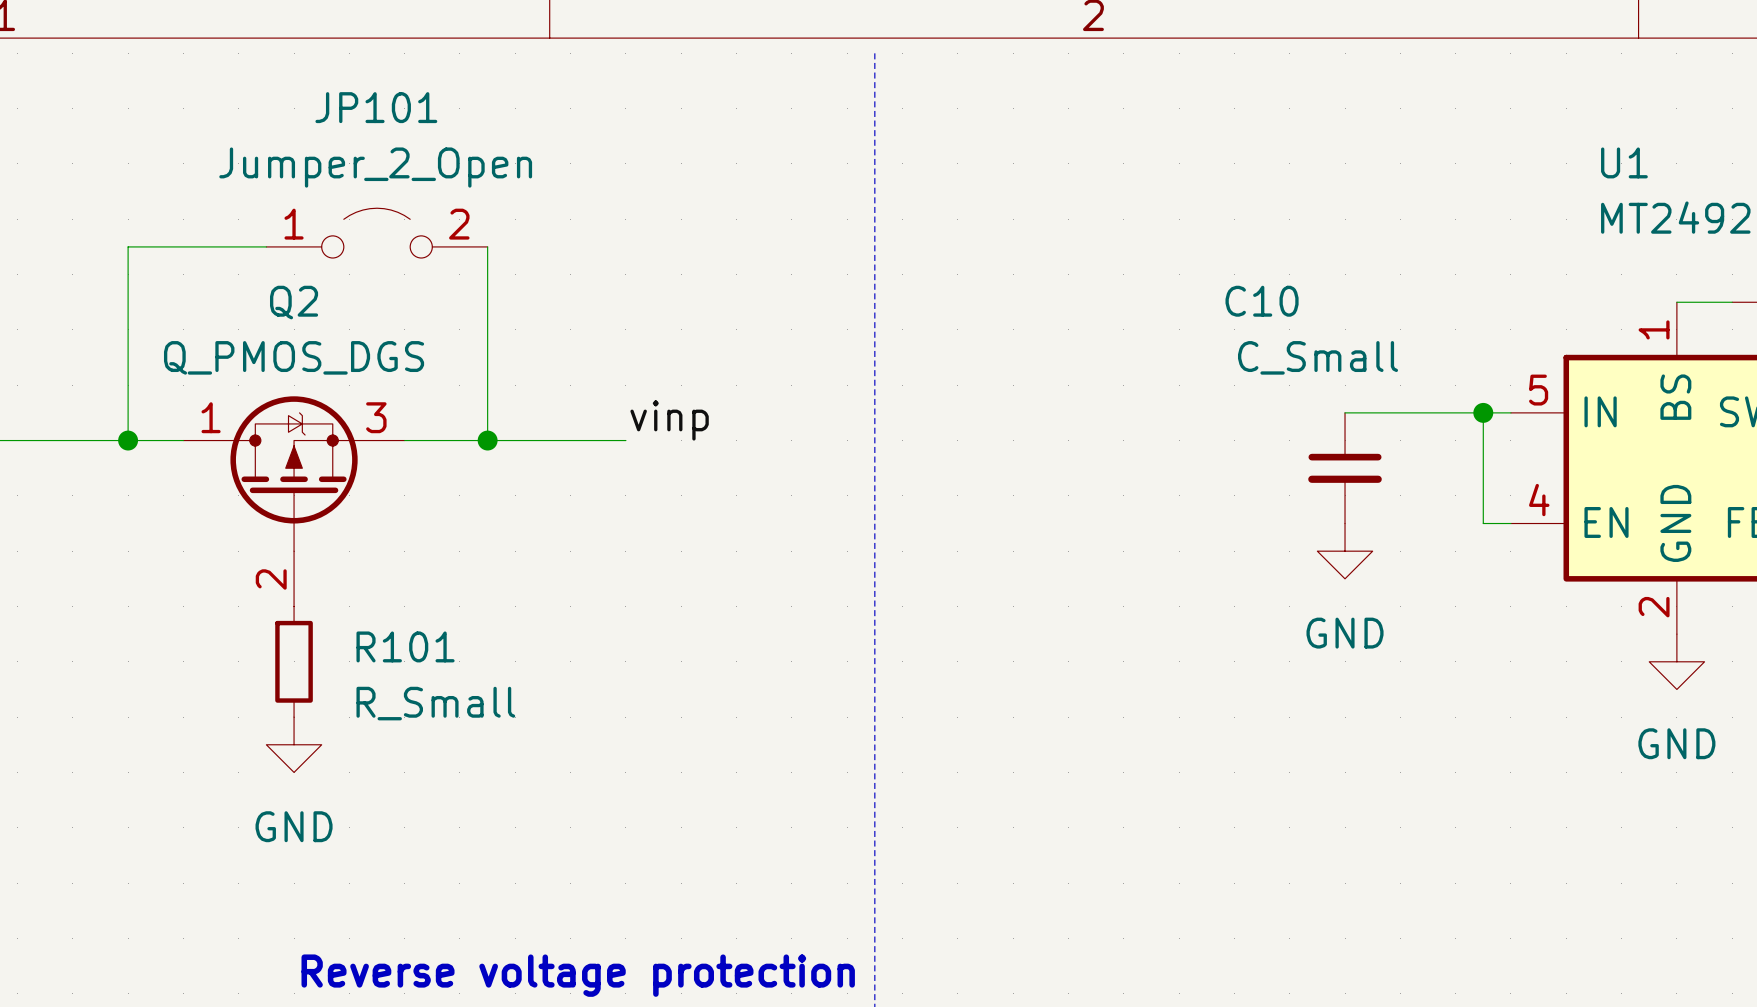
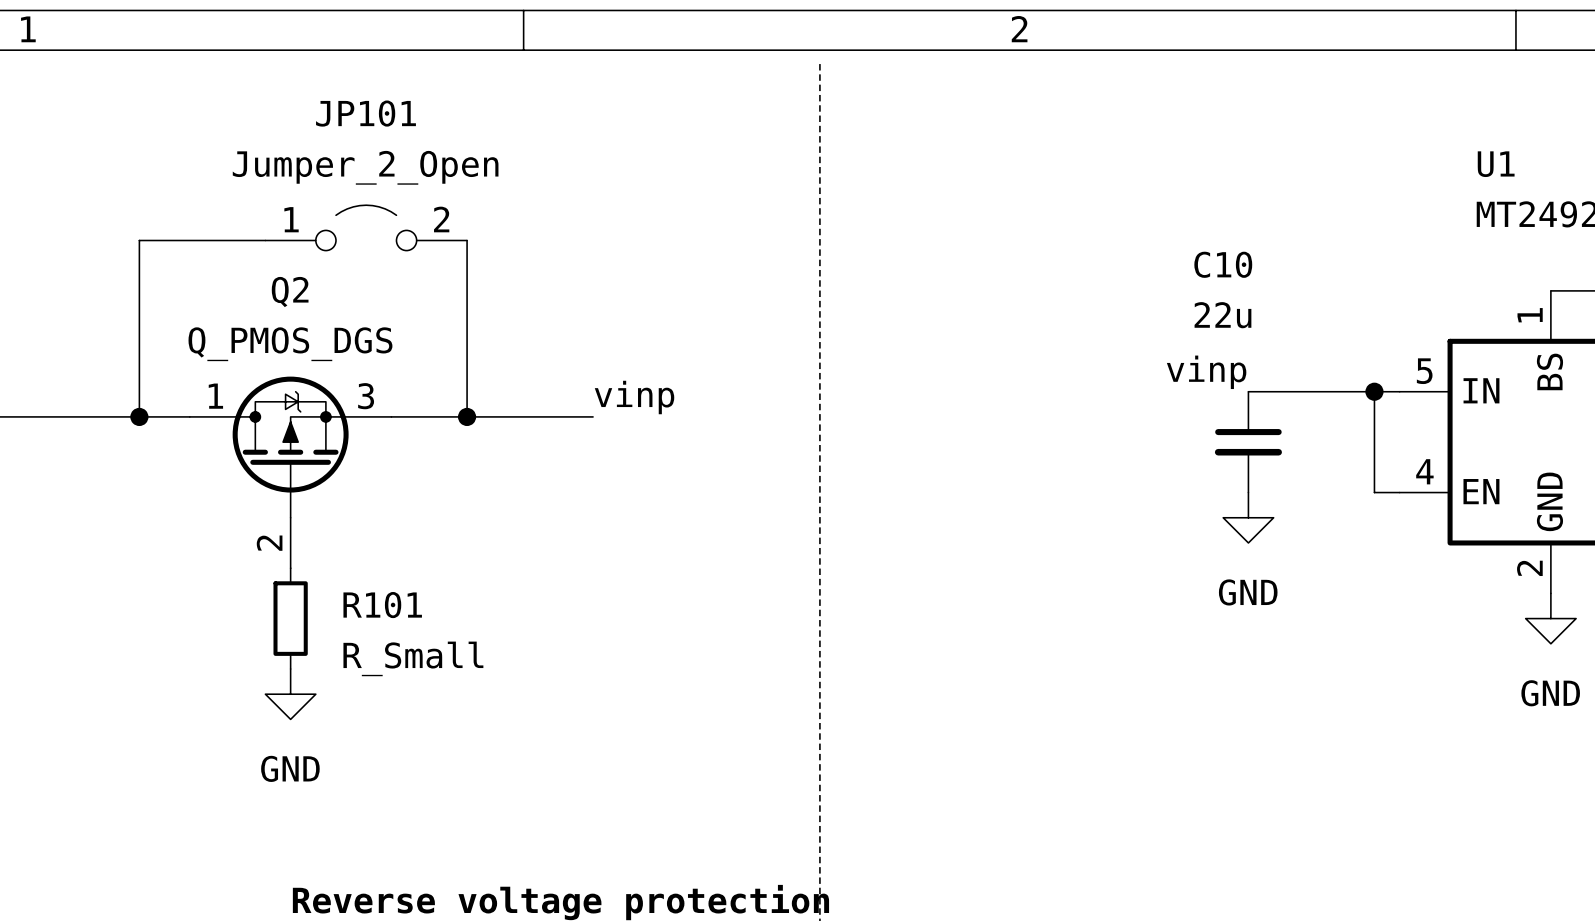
C10 name position: C10 (1262, 301) -> C10 (1223, 264)
C10 value: C_Small (1318, 357) -> 22u (1222, 315)
label: none -> vinp (1206, 372)

